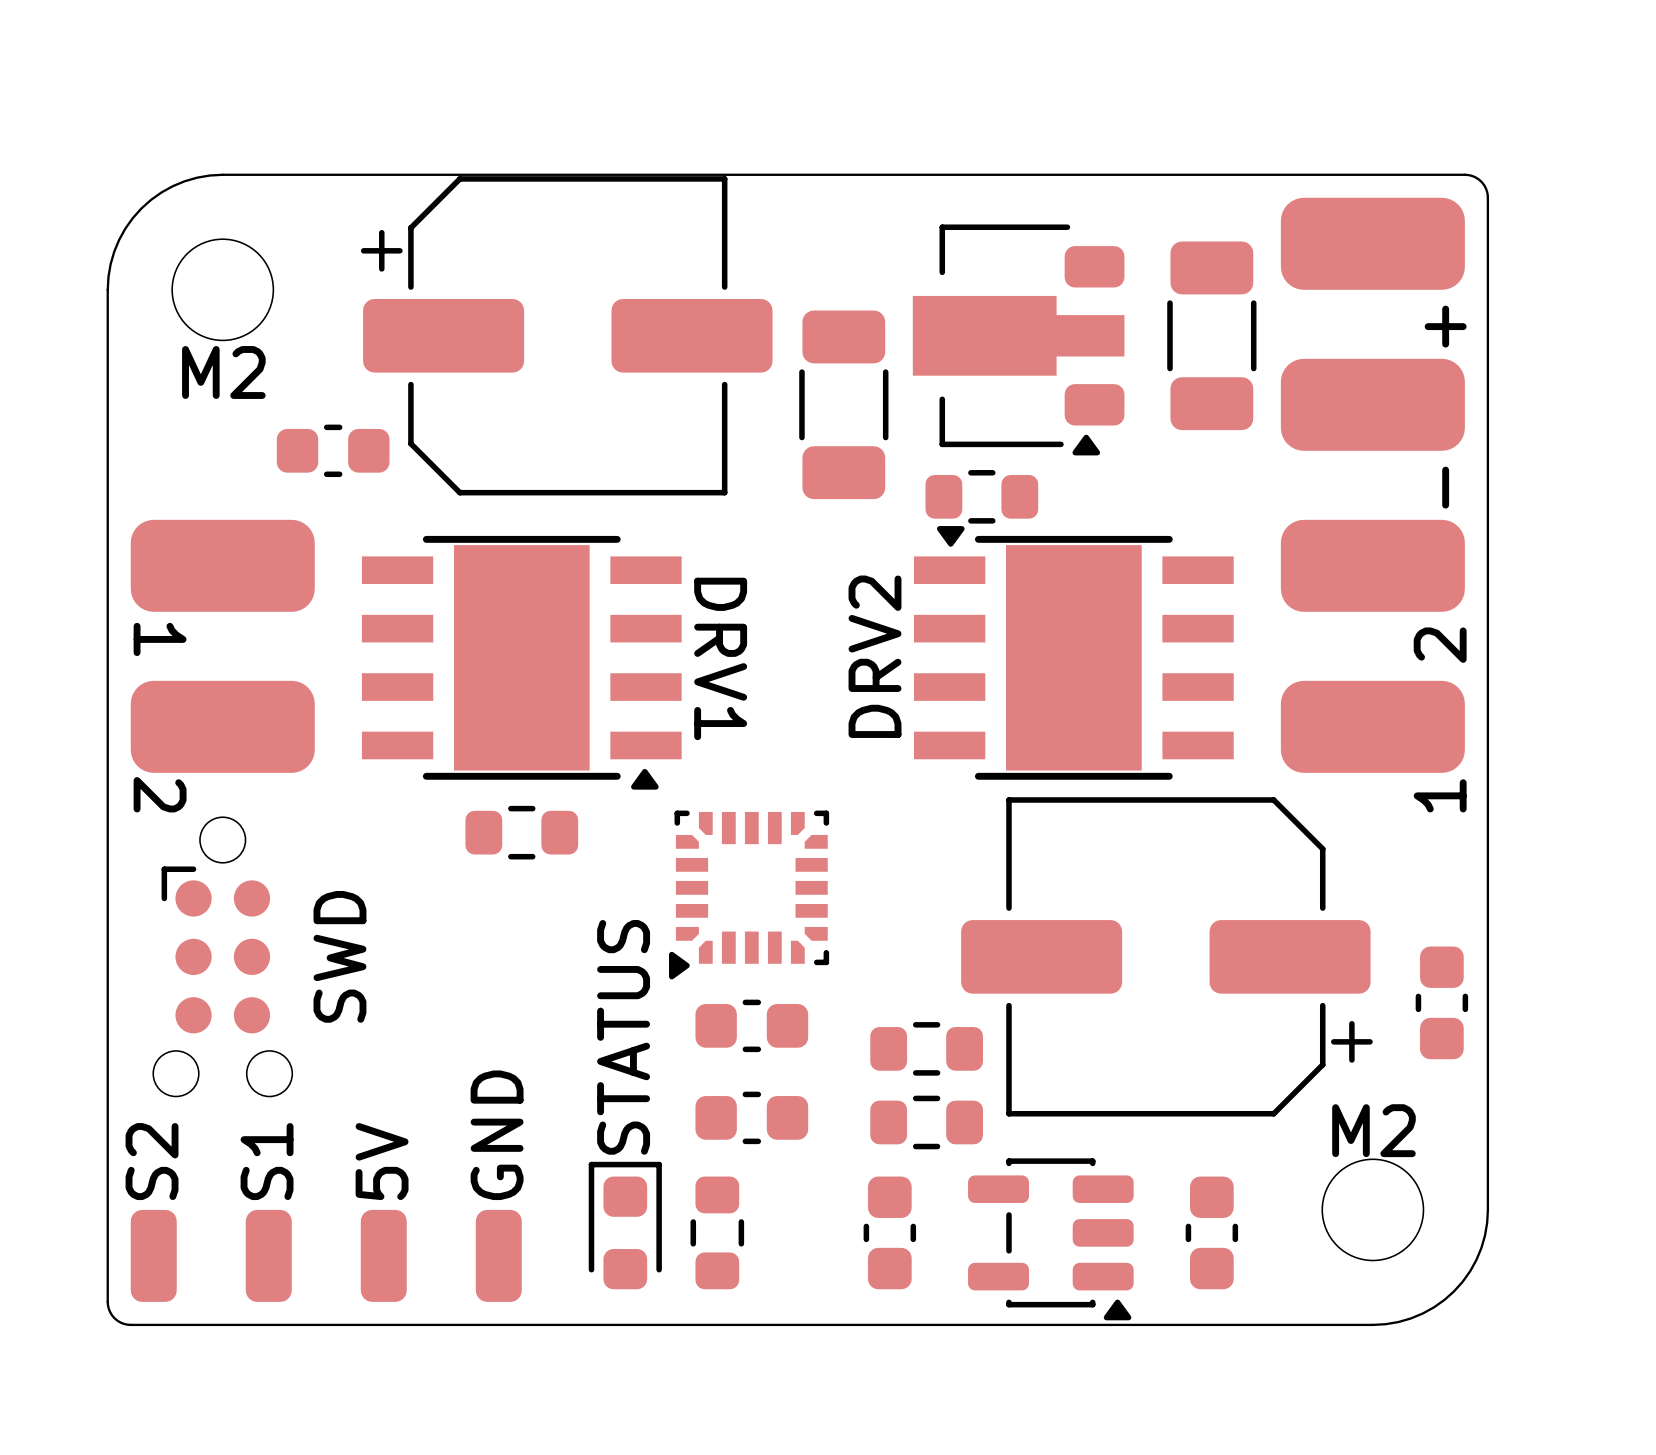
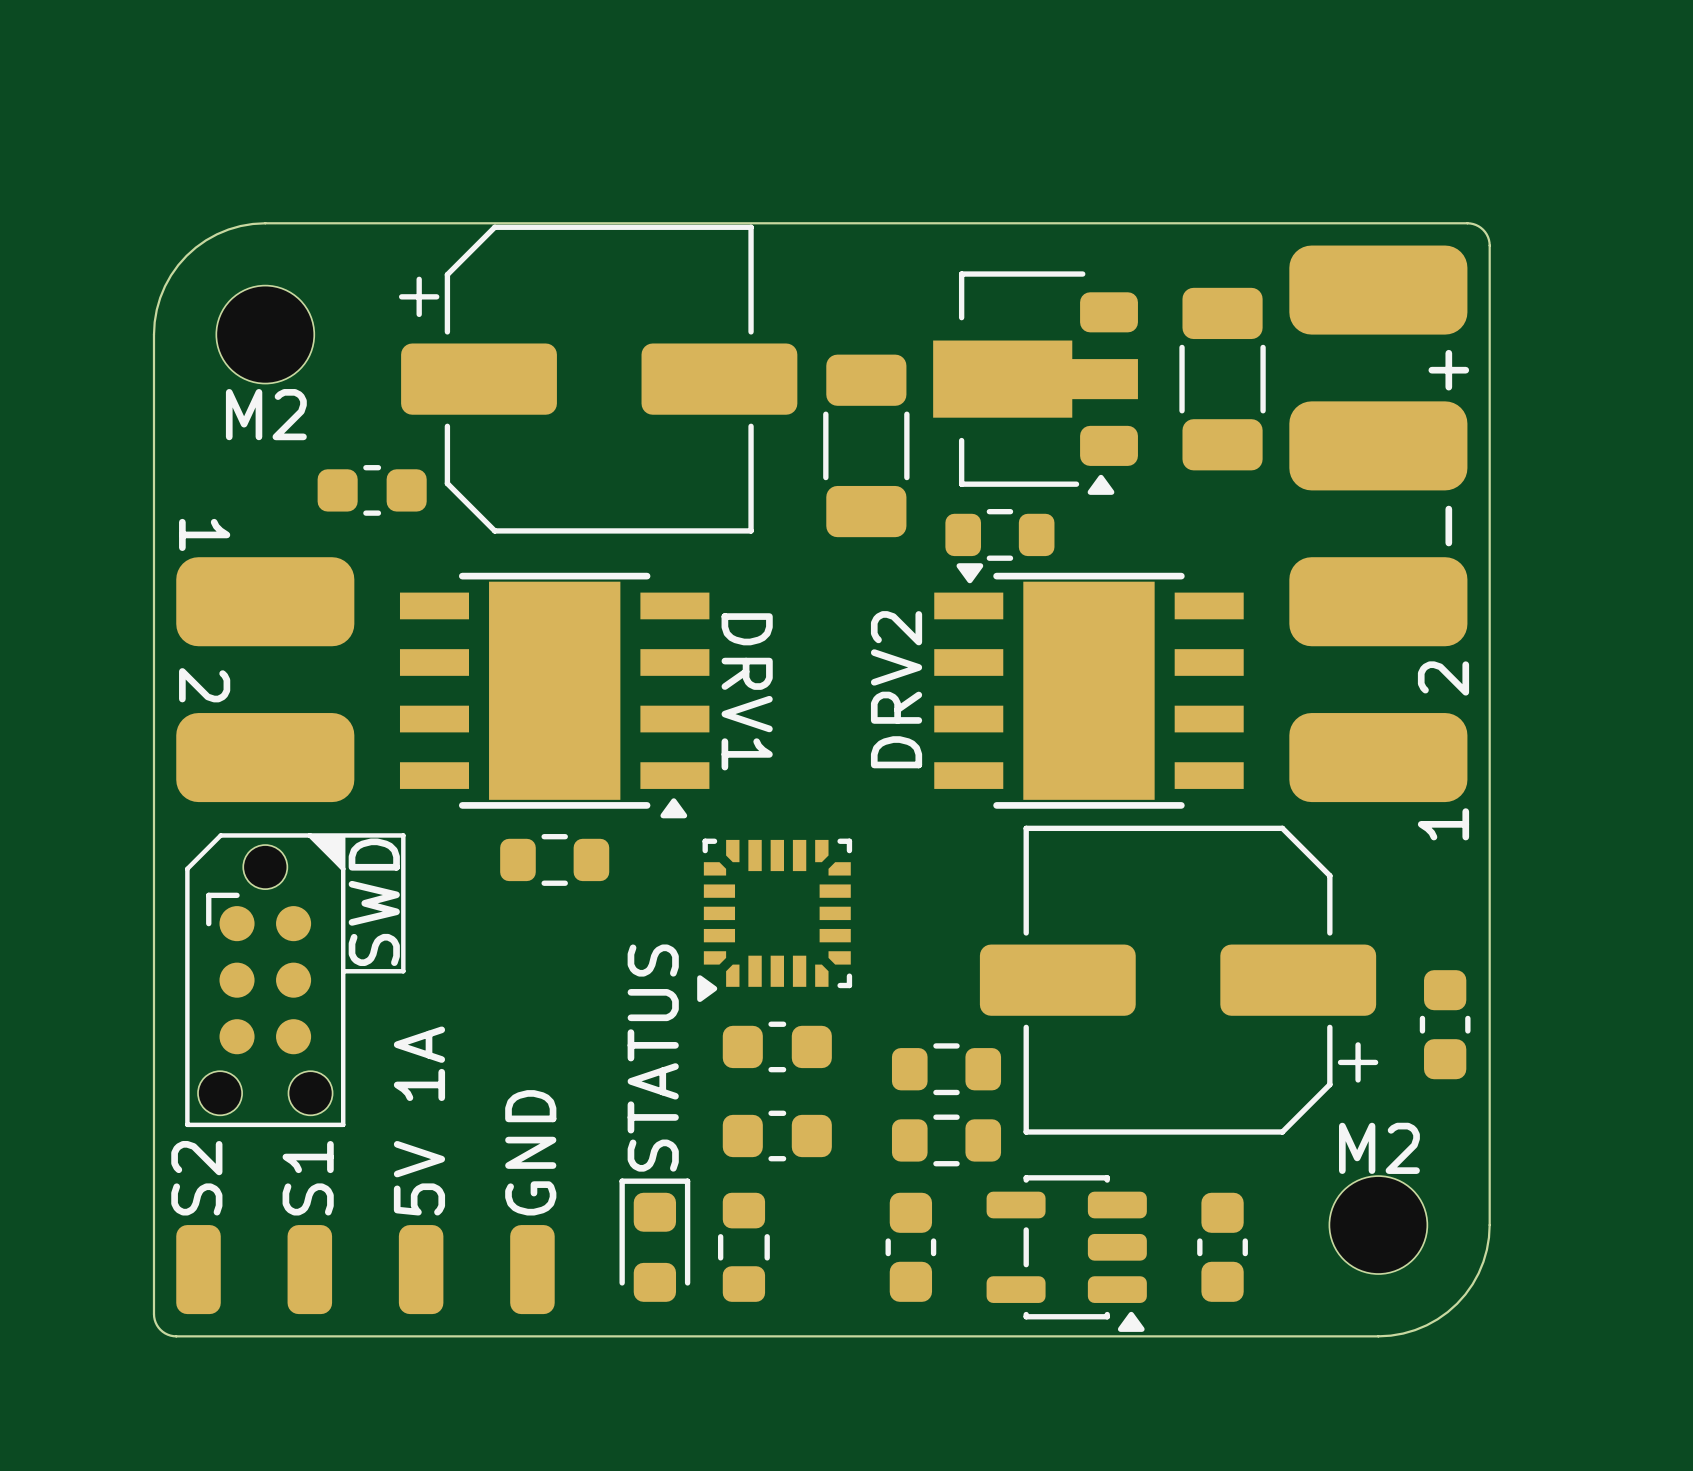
text: none -> 1 (204, 534)
text: 1 (160, 639) -> 2 (204, 685)
text: 2 (160, 794) -> none
line: none -> (309, 835) (343, 868) (343, 1124) (187, 1124) (187, 868) (220, 835) (403, 835) (403, 971) (345, 971)
drawing: none -> [312, 835, 346, 872]
text position: SWD (339, 956) -> SWD (374, 902)
text: 5V (382, 1161) -> 5V 1A (419, 1121)

